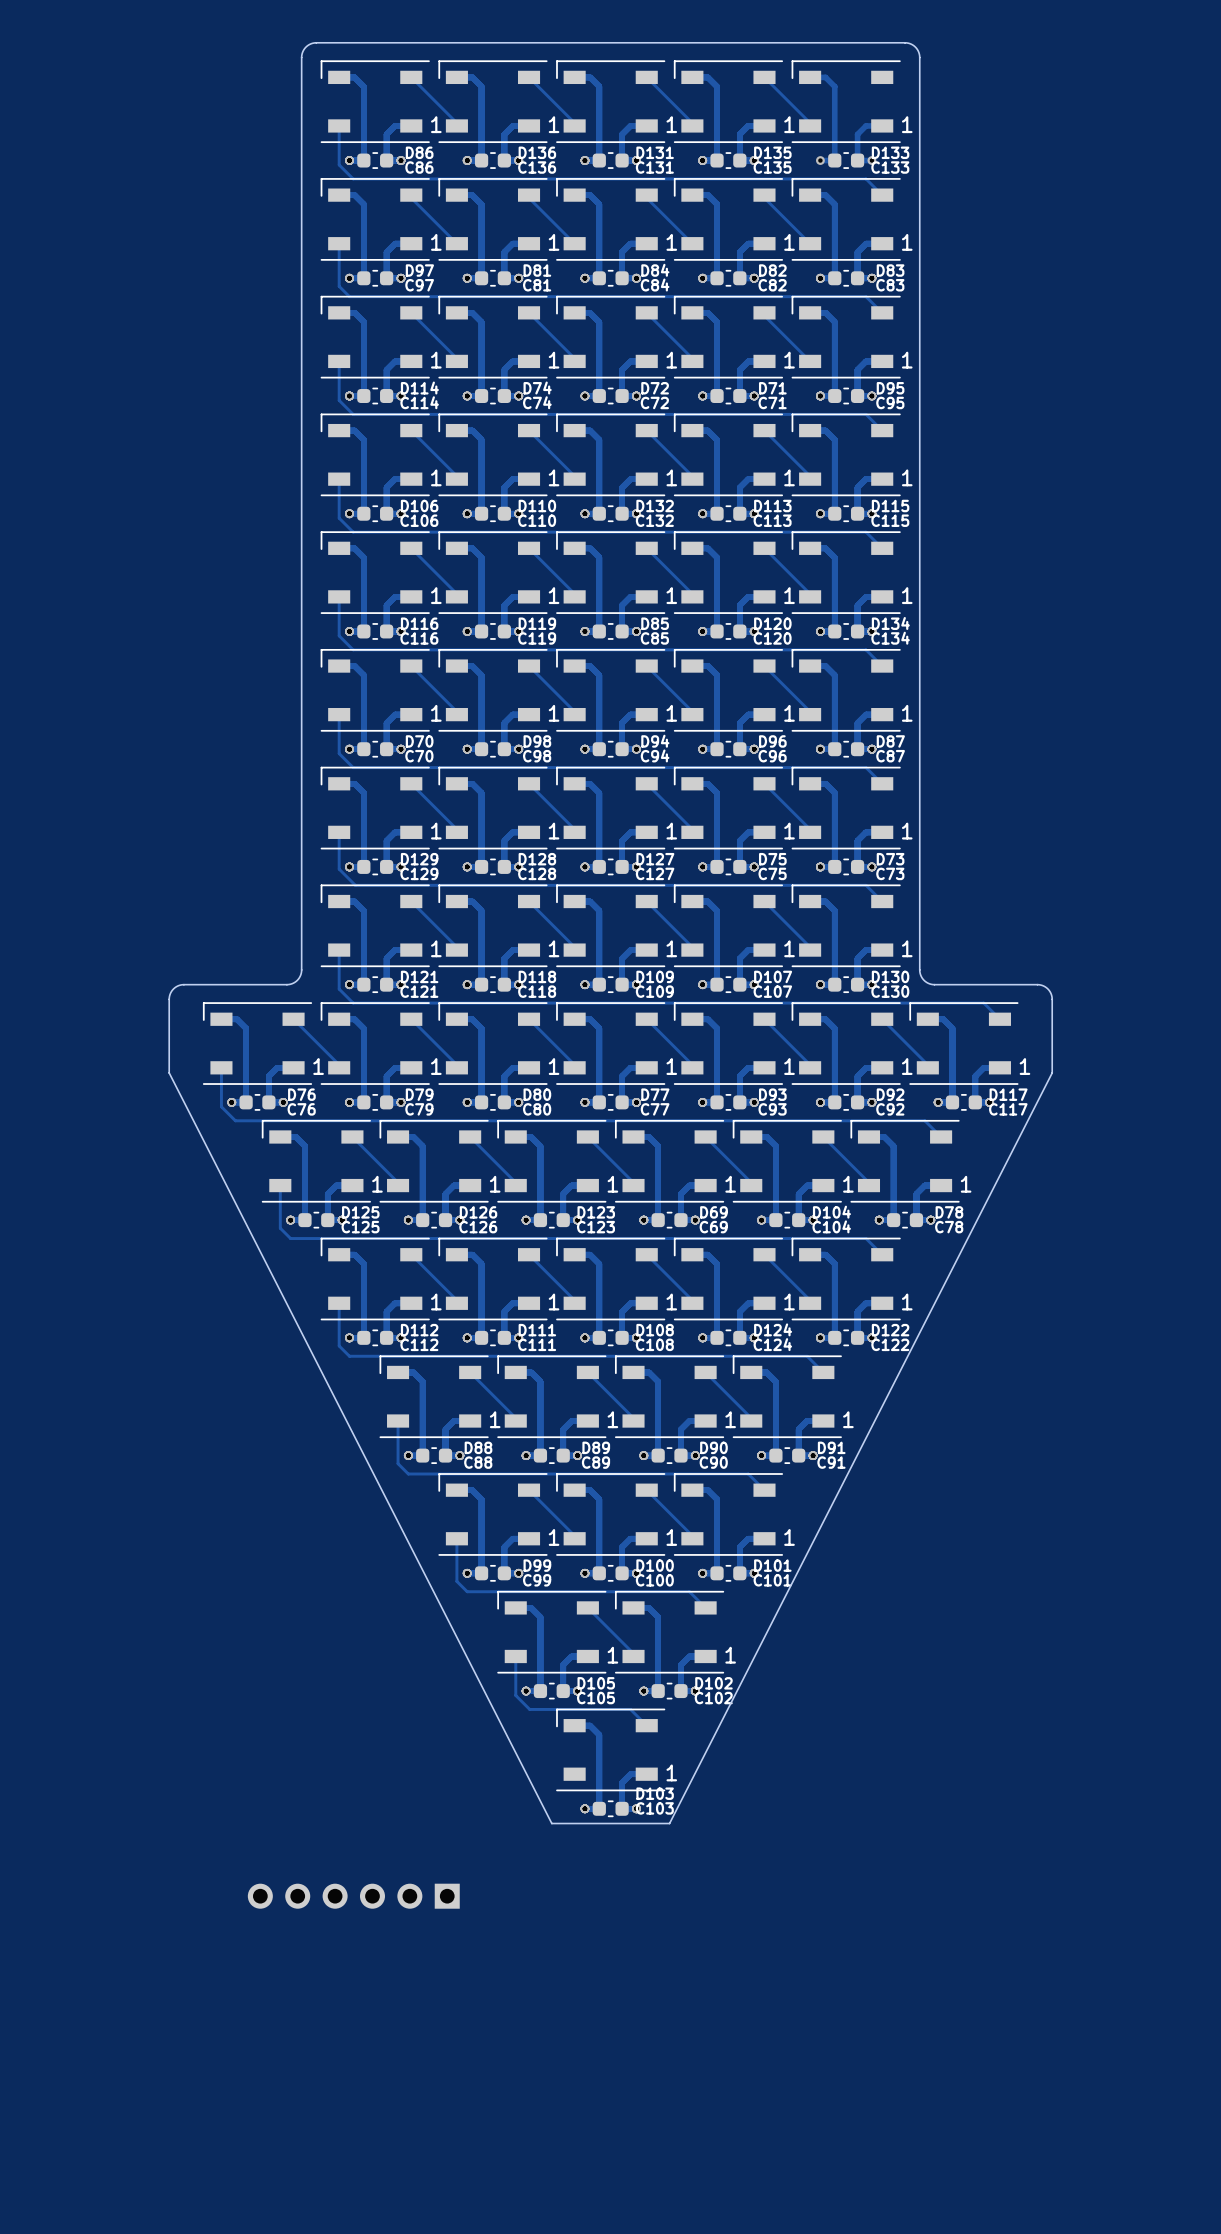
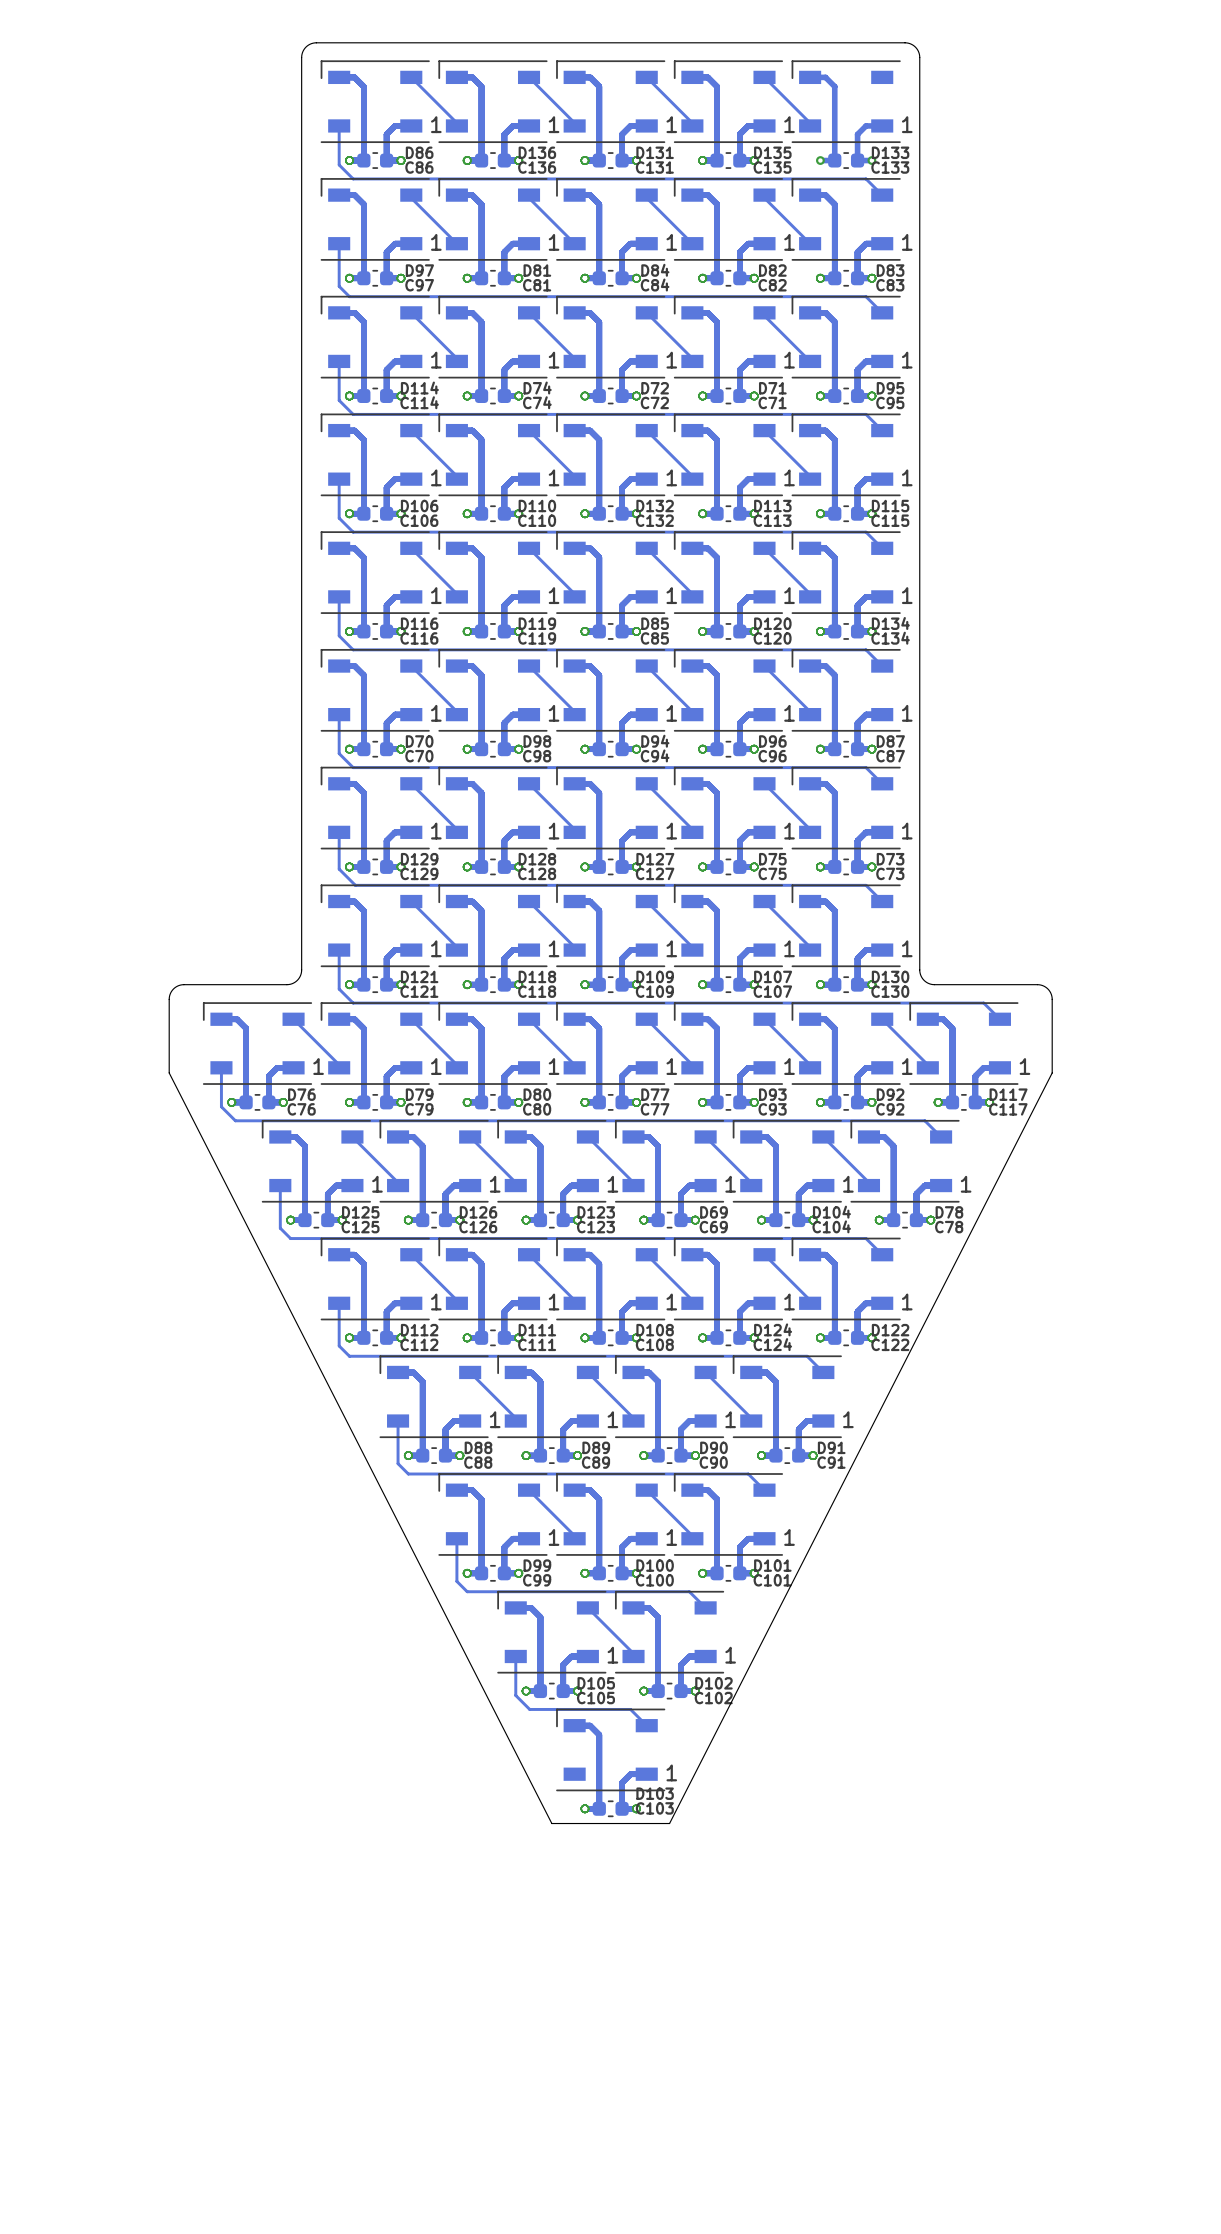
part: (353, 1896) -> none

